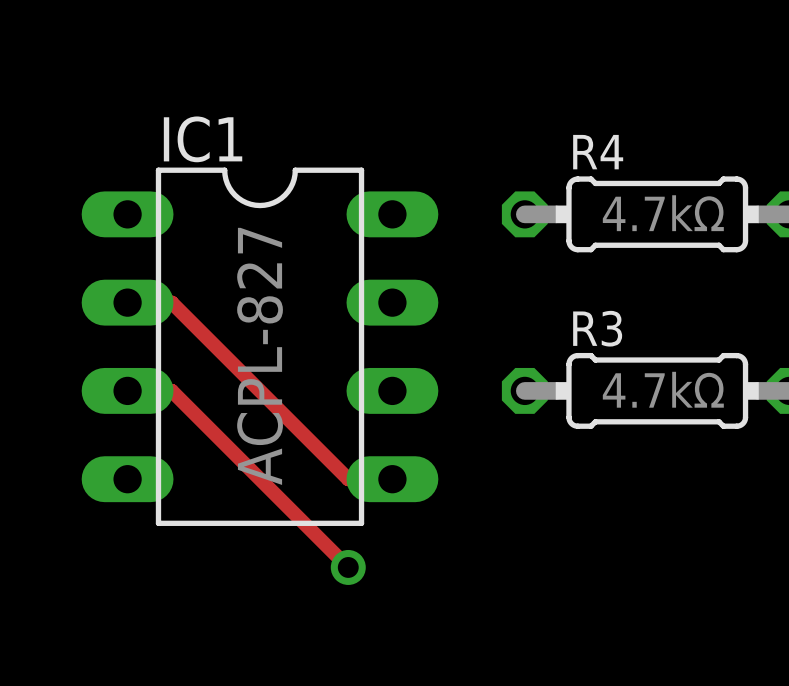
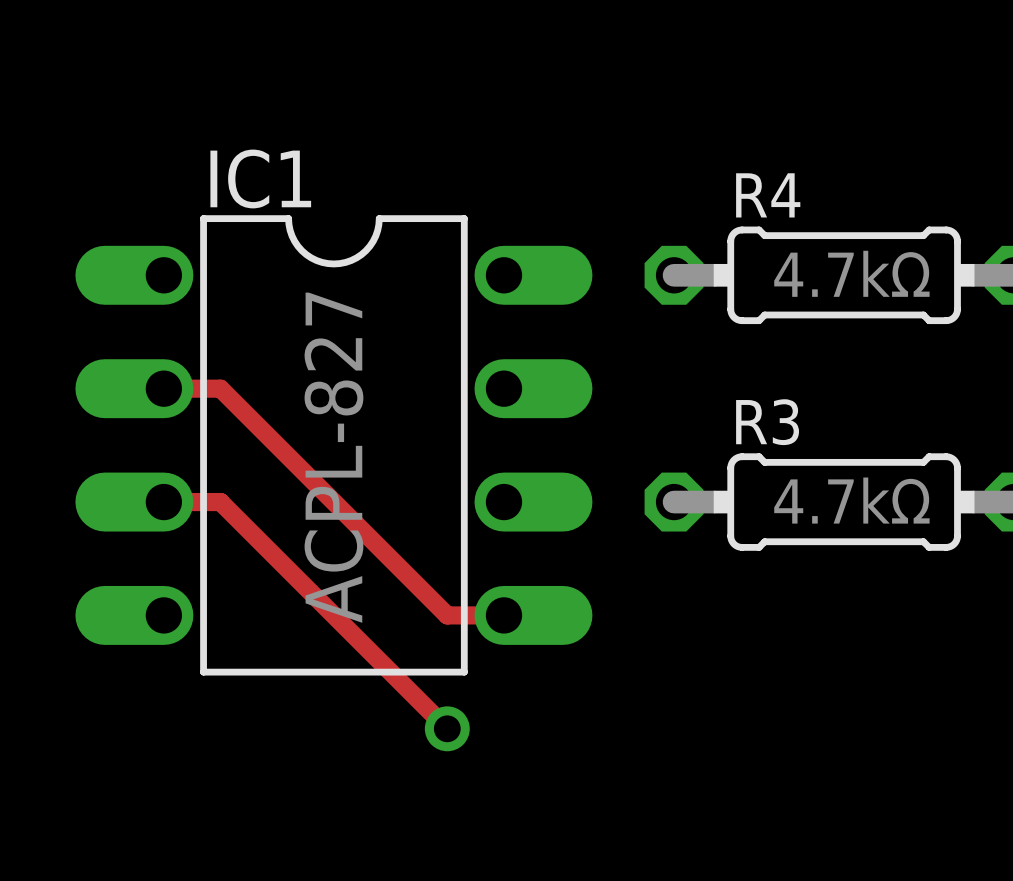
IC1 footprint: [81, 167, 439, 526] -> [75, 215, 593, 676]

